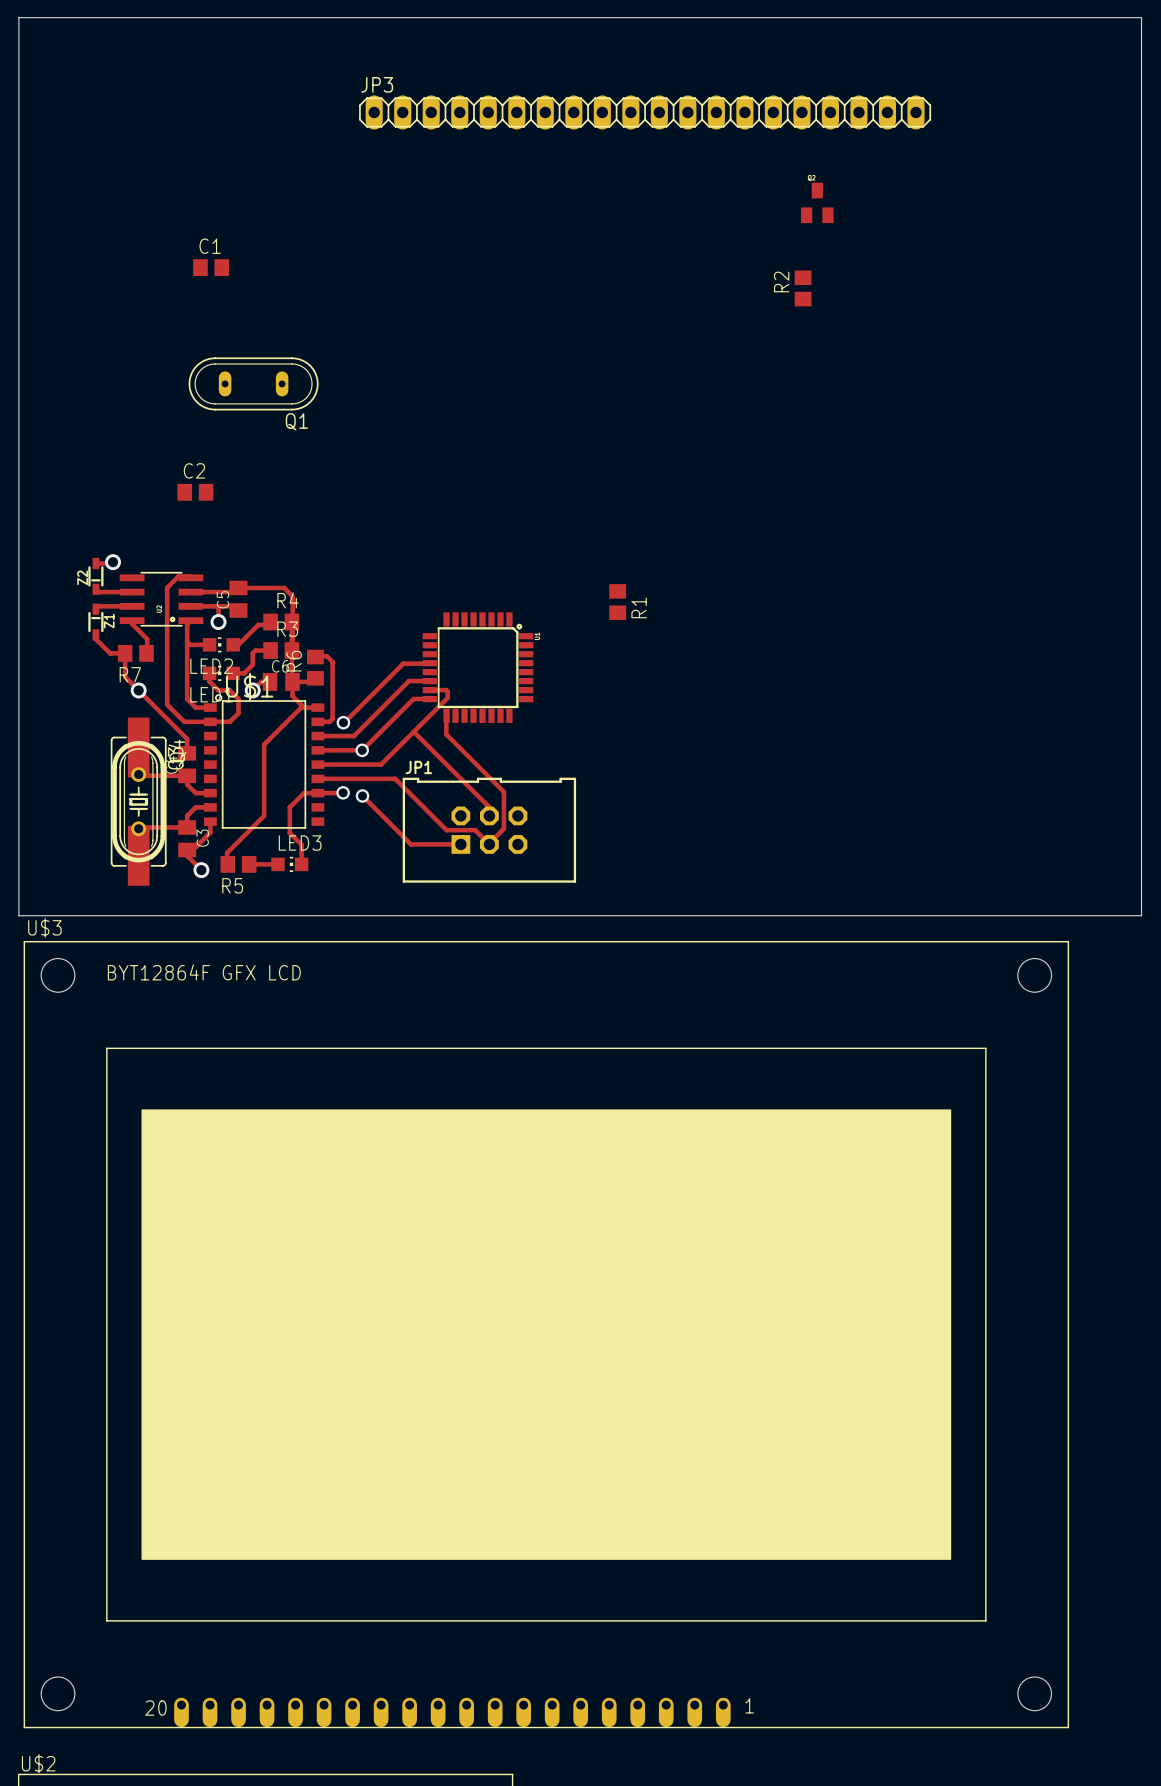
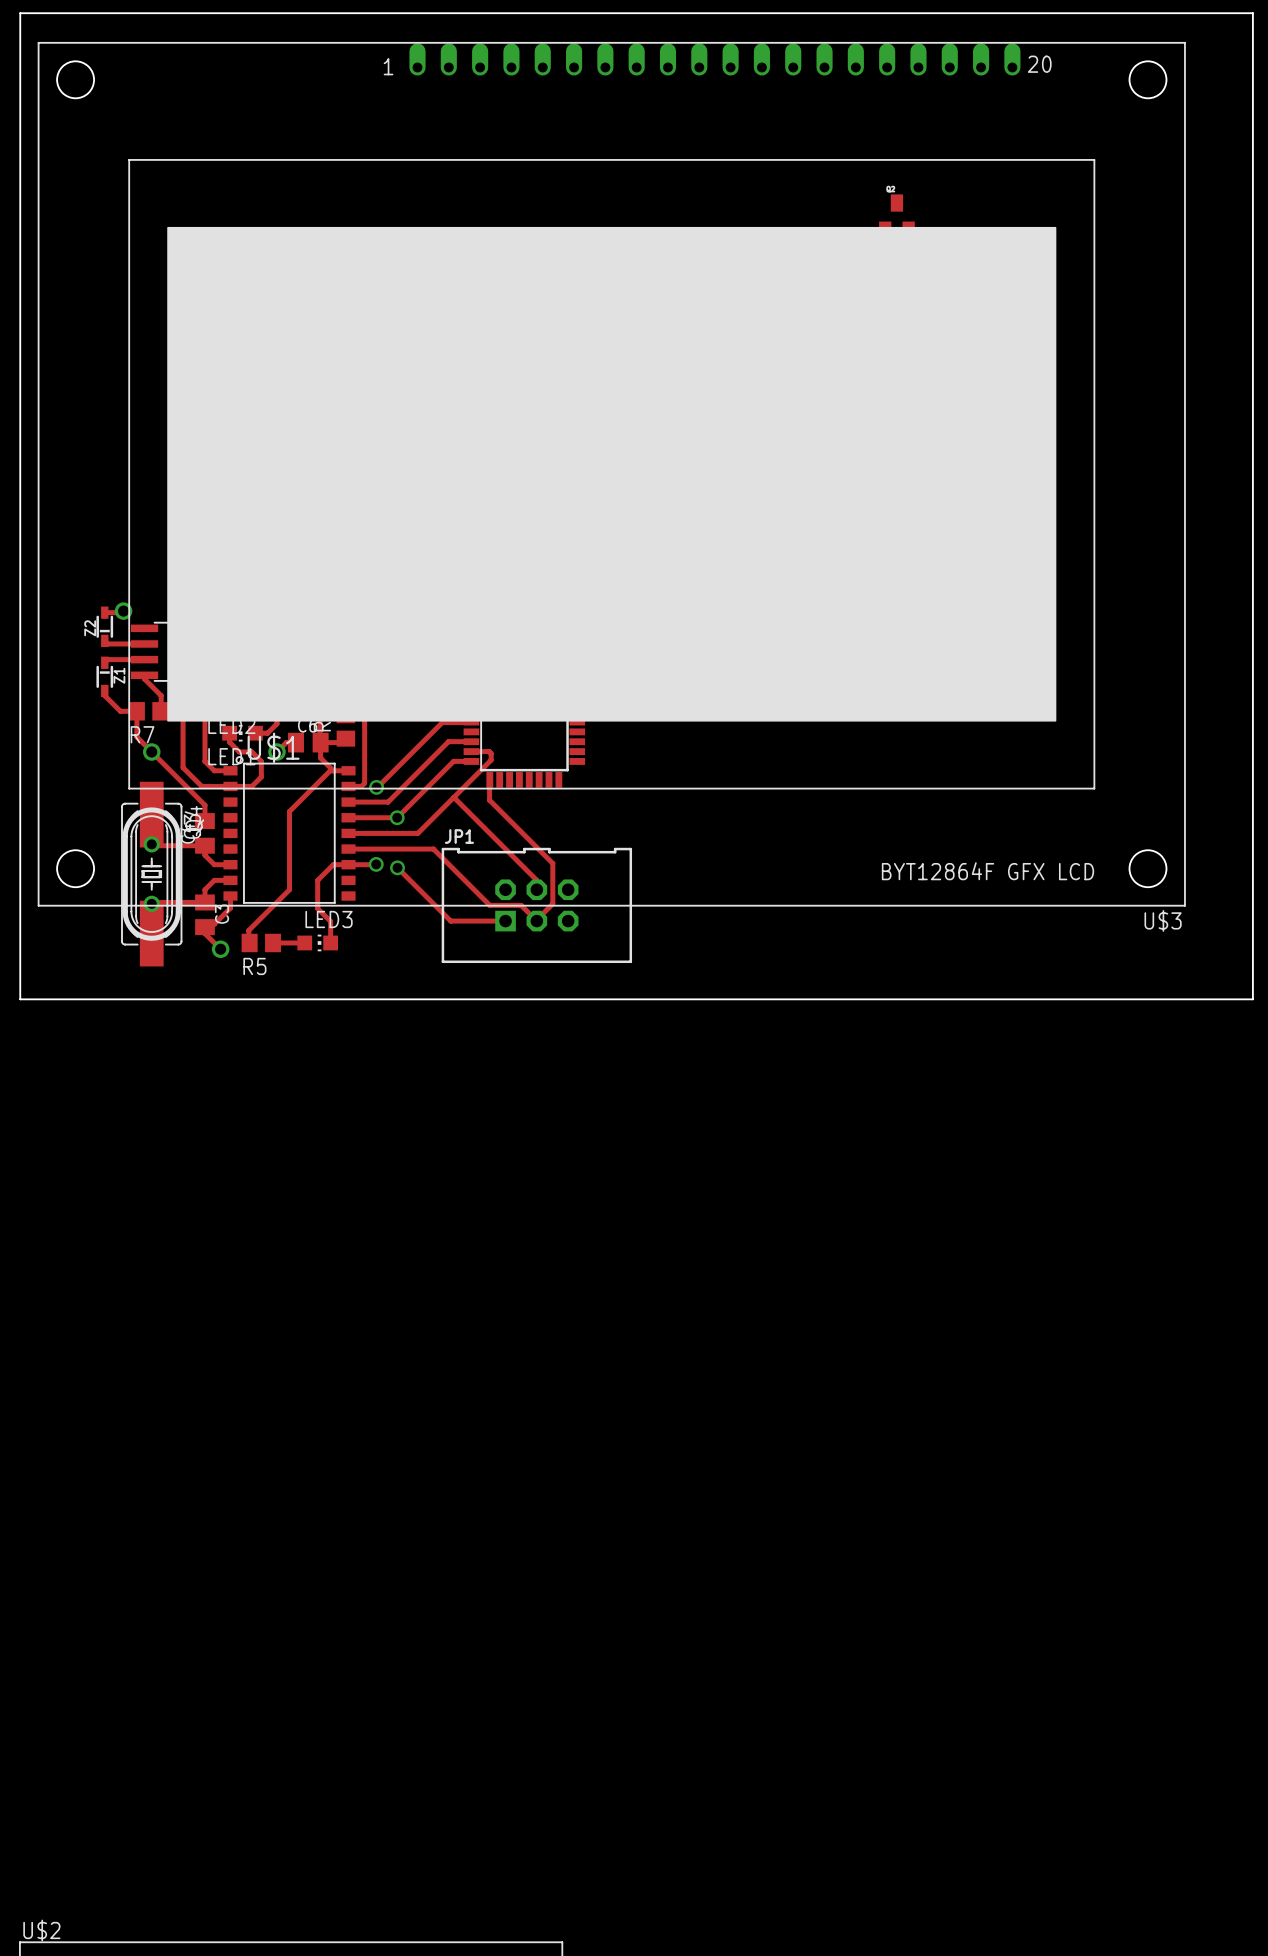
JP3: (645, 112) -> none
U$3 name position: U$3 (44, 927) -> U$3 (1163, 920)
U$3 footprint: [23, 940, 1070, 1729] -> [37, 42, 1186, 907]

